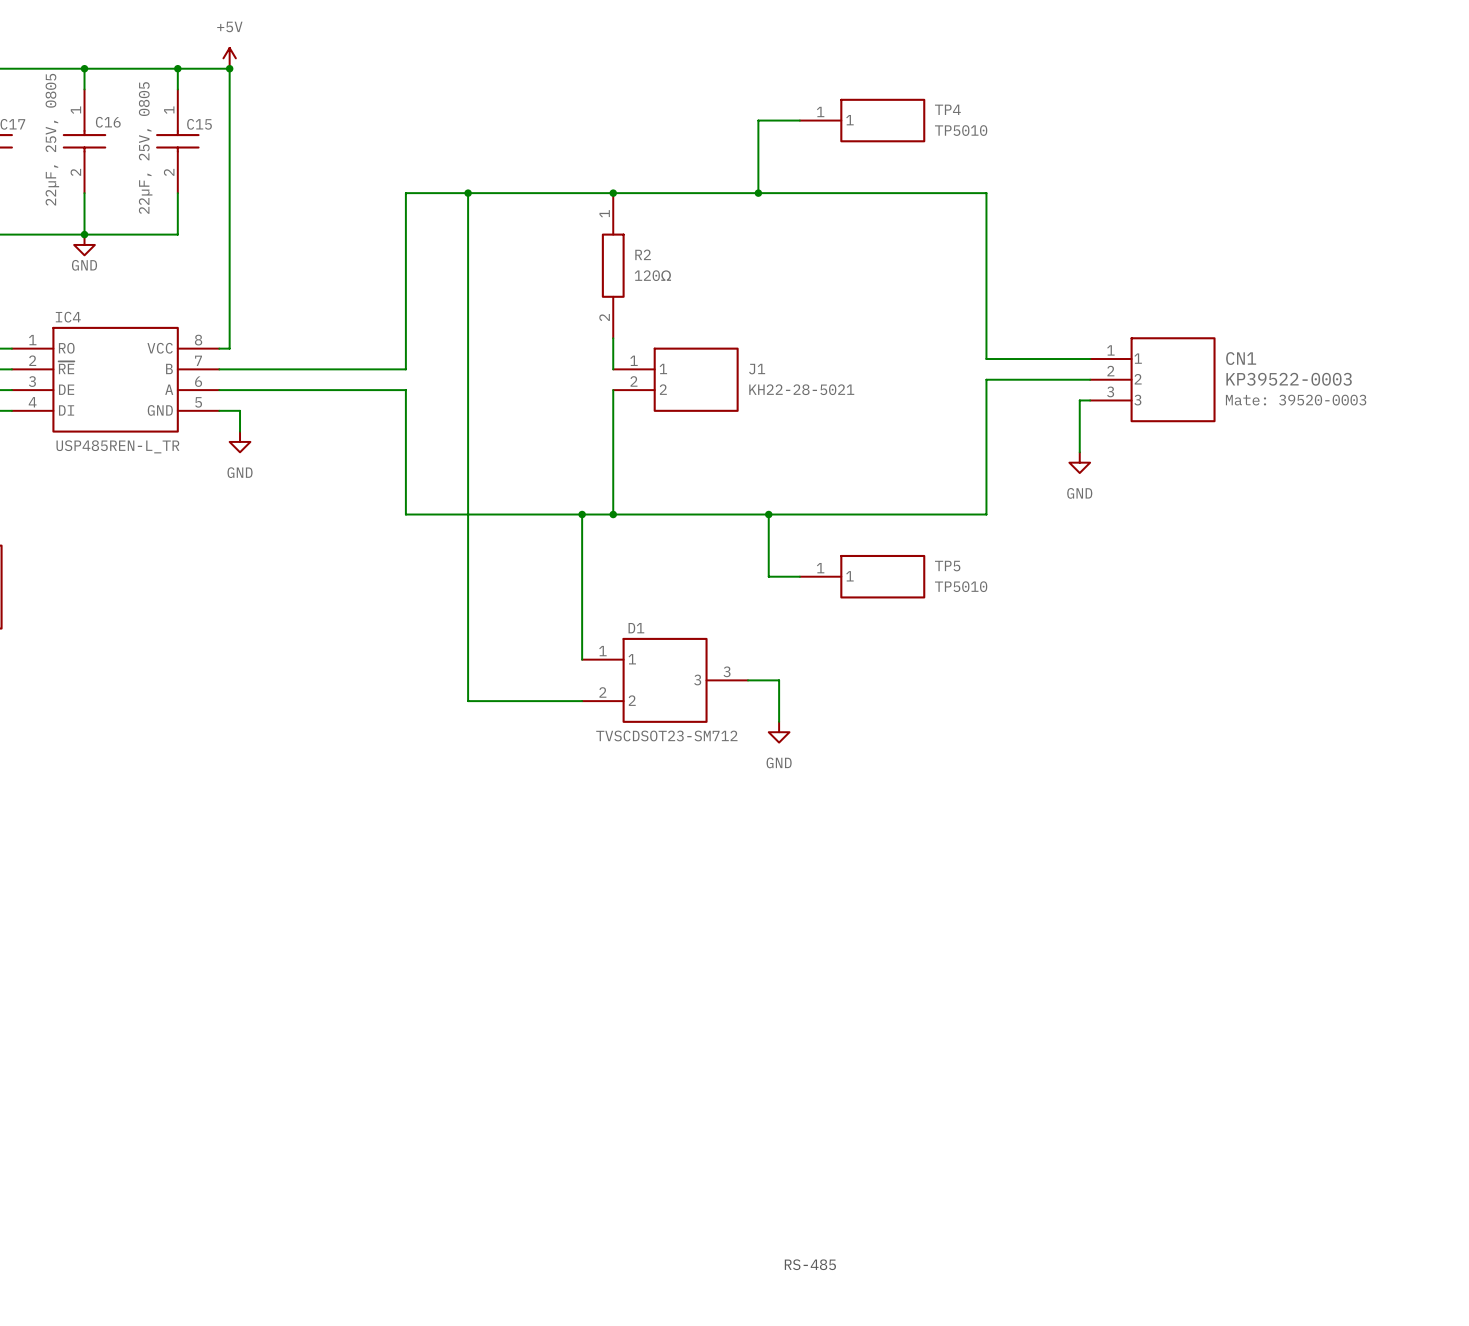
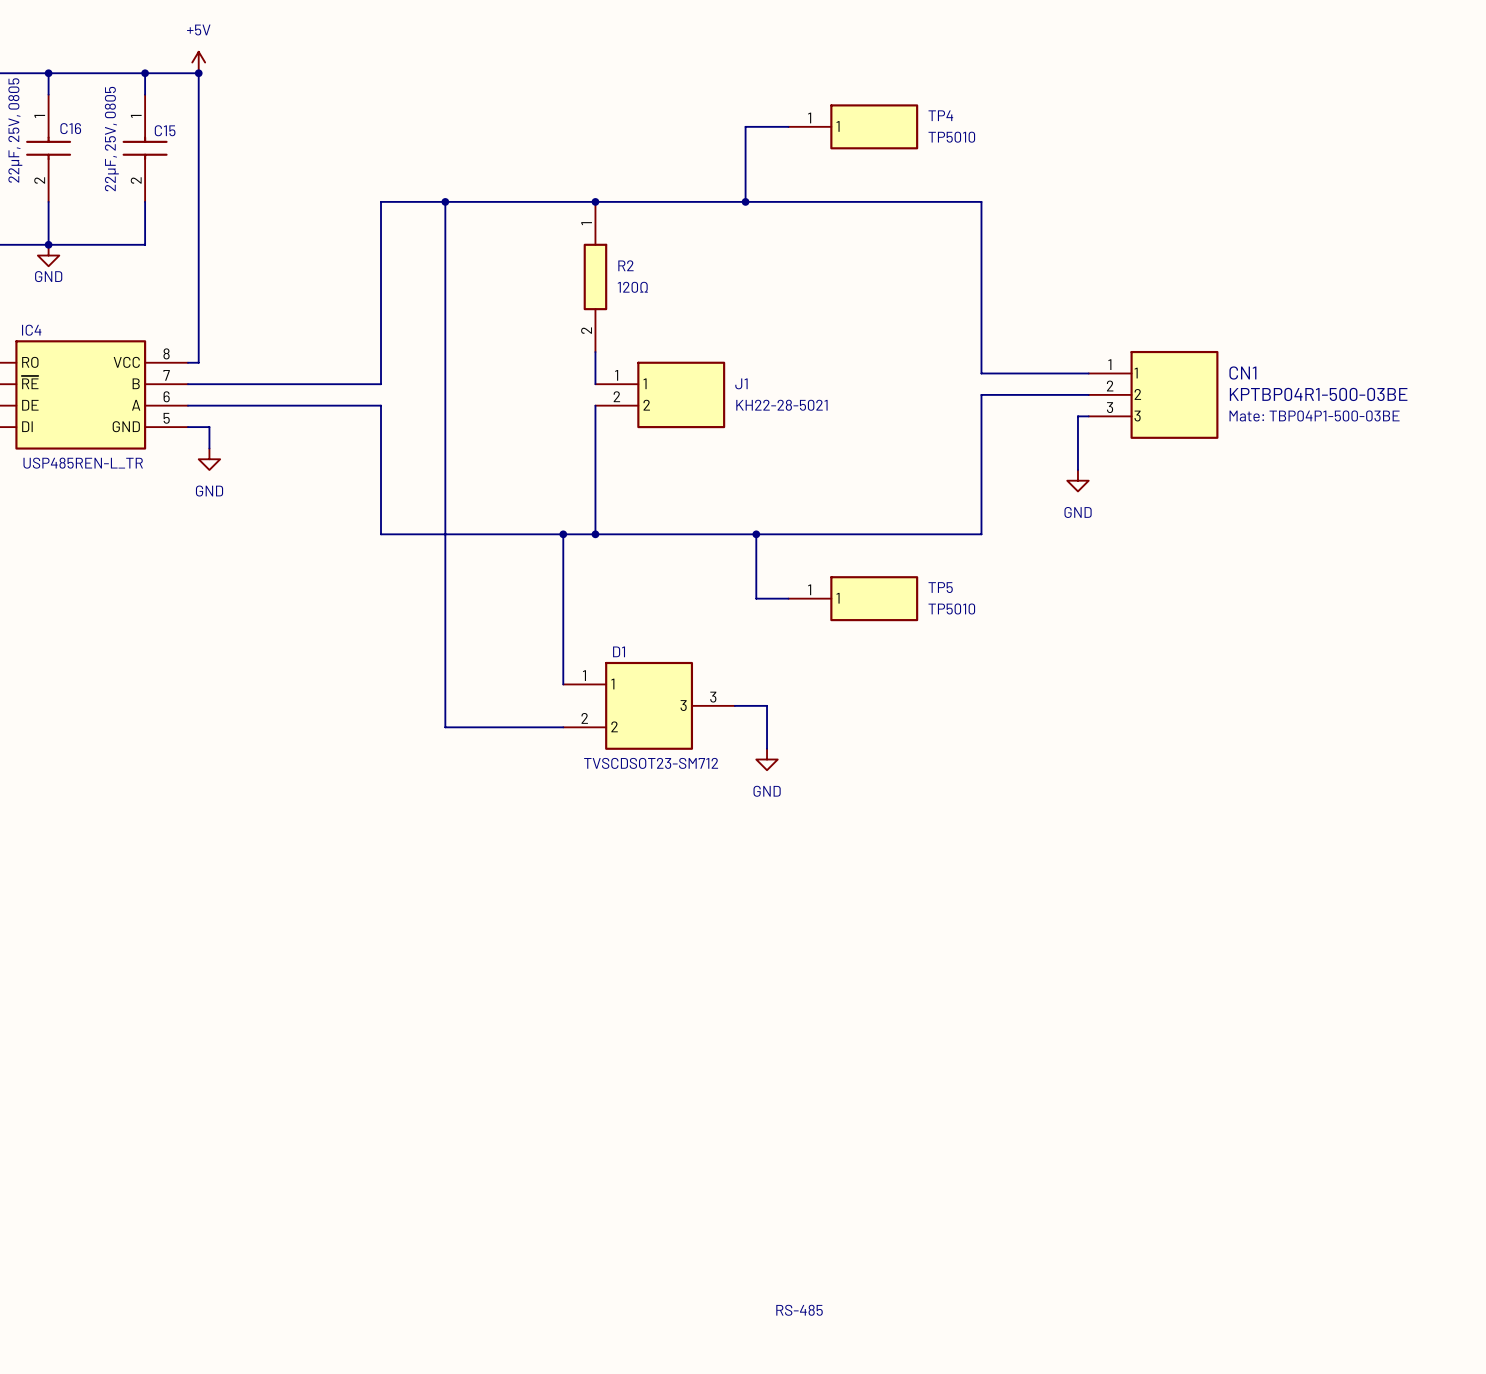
CN1 value: KP39522-0003 (1289, 379) -> KPTBP04R1-500-03BE (1318, 394)
CN1 text: Mate: 39520-0003 (1296, 400) -> Mate: TBP04P1-500-03BE (1314, 415)

